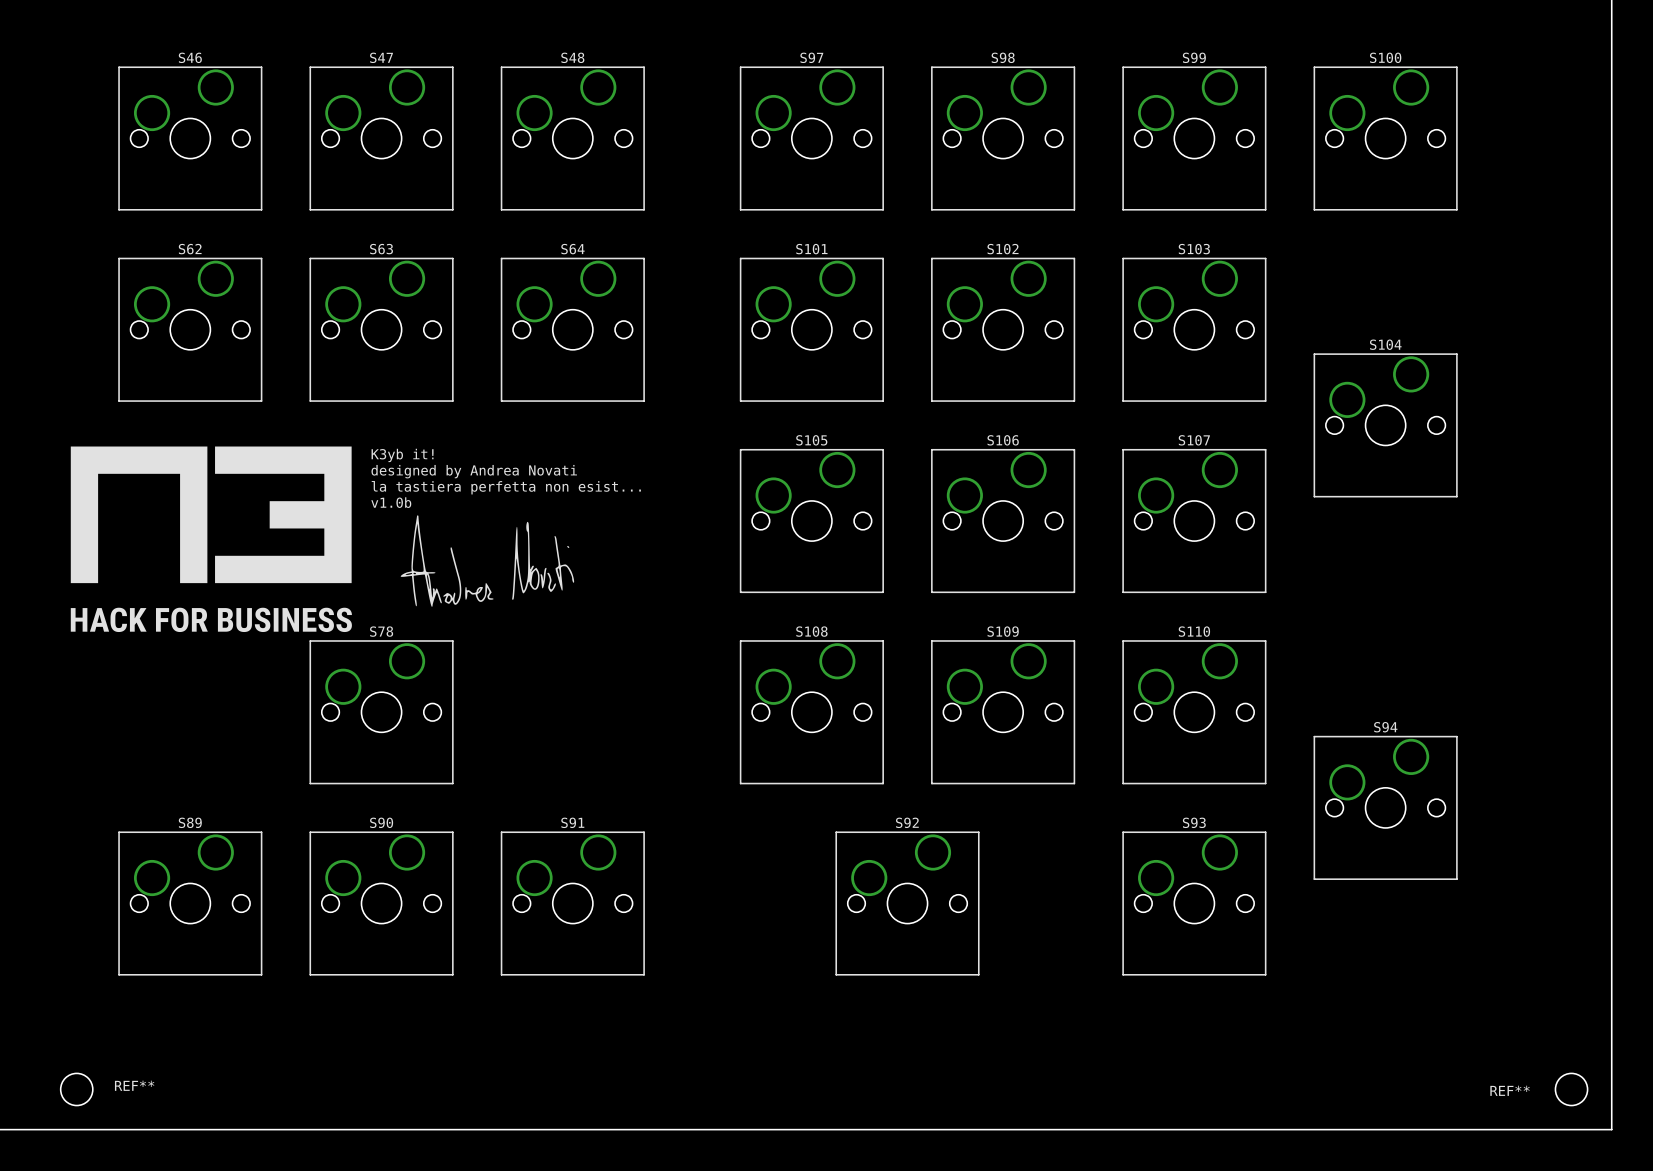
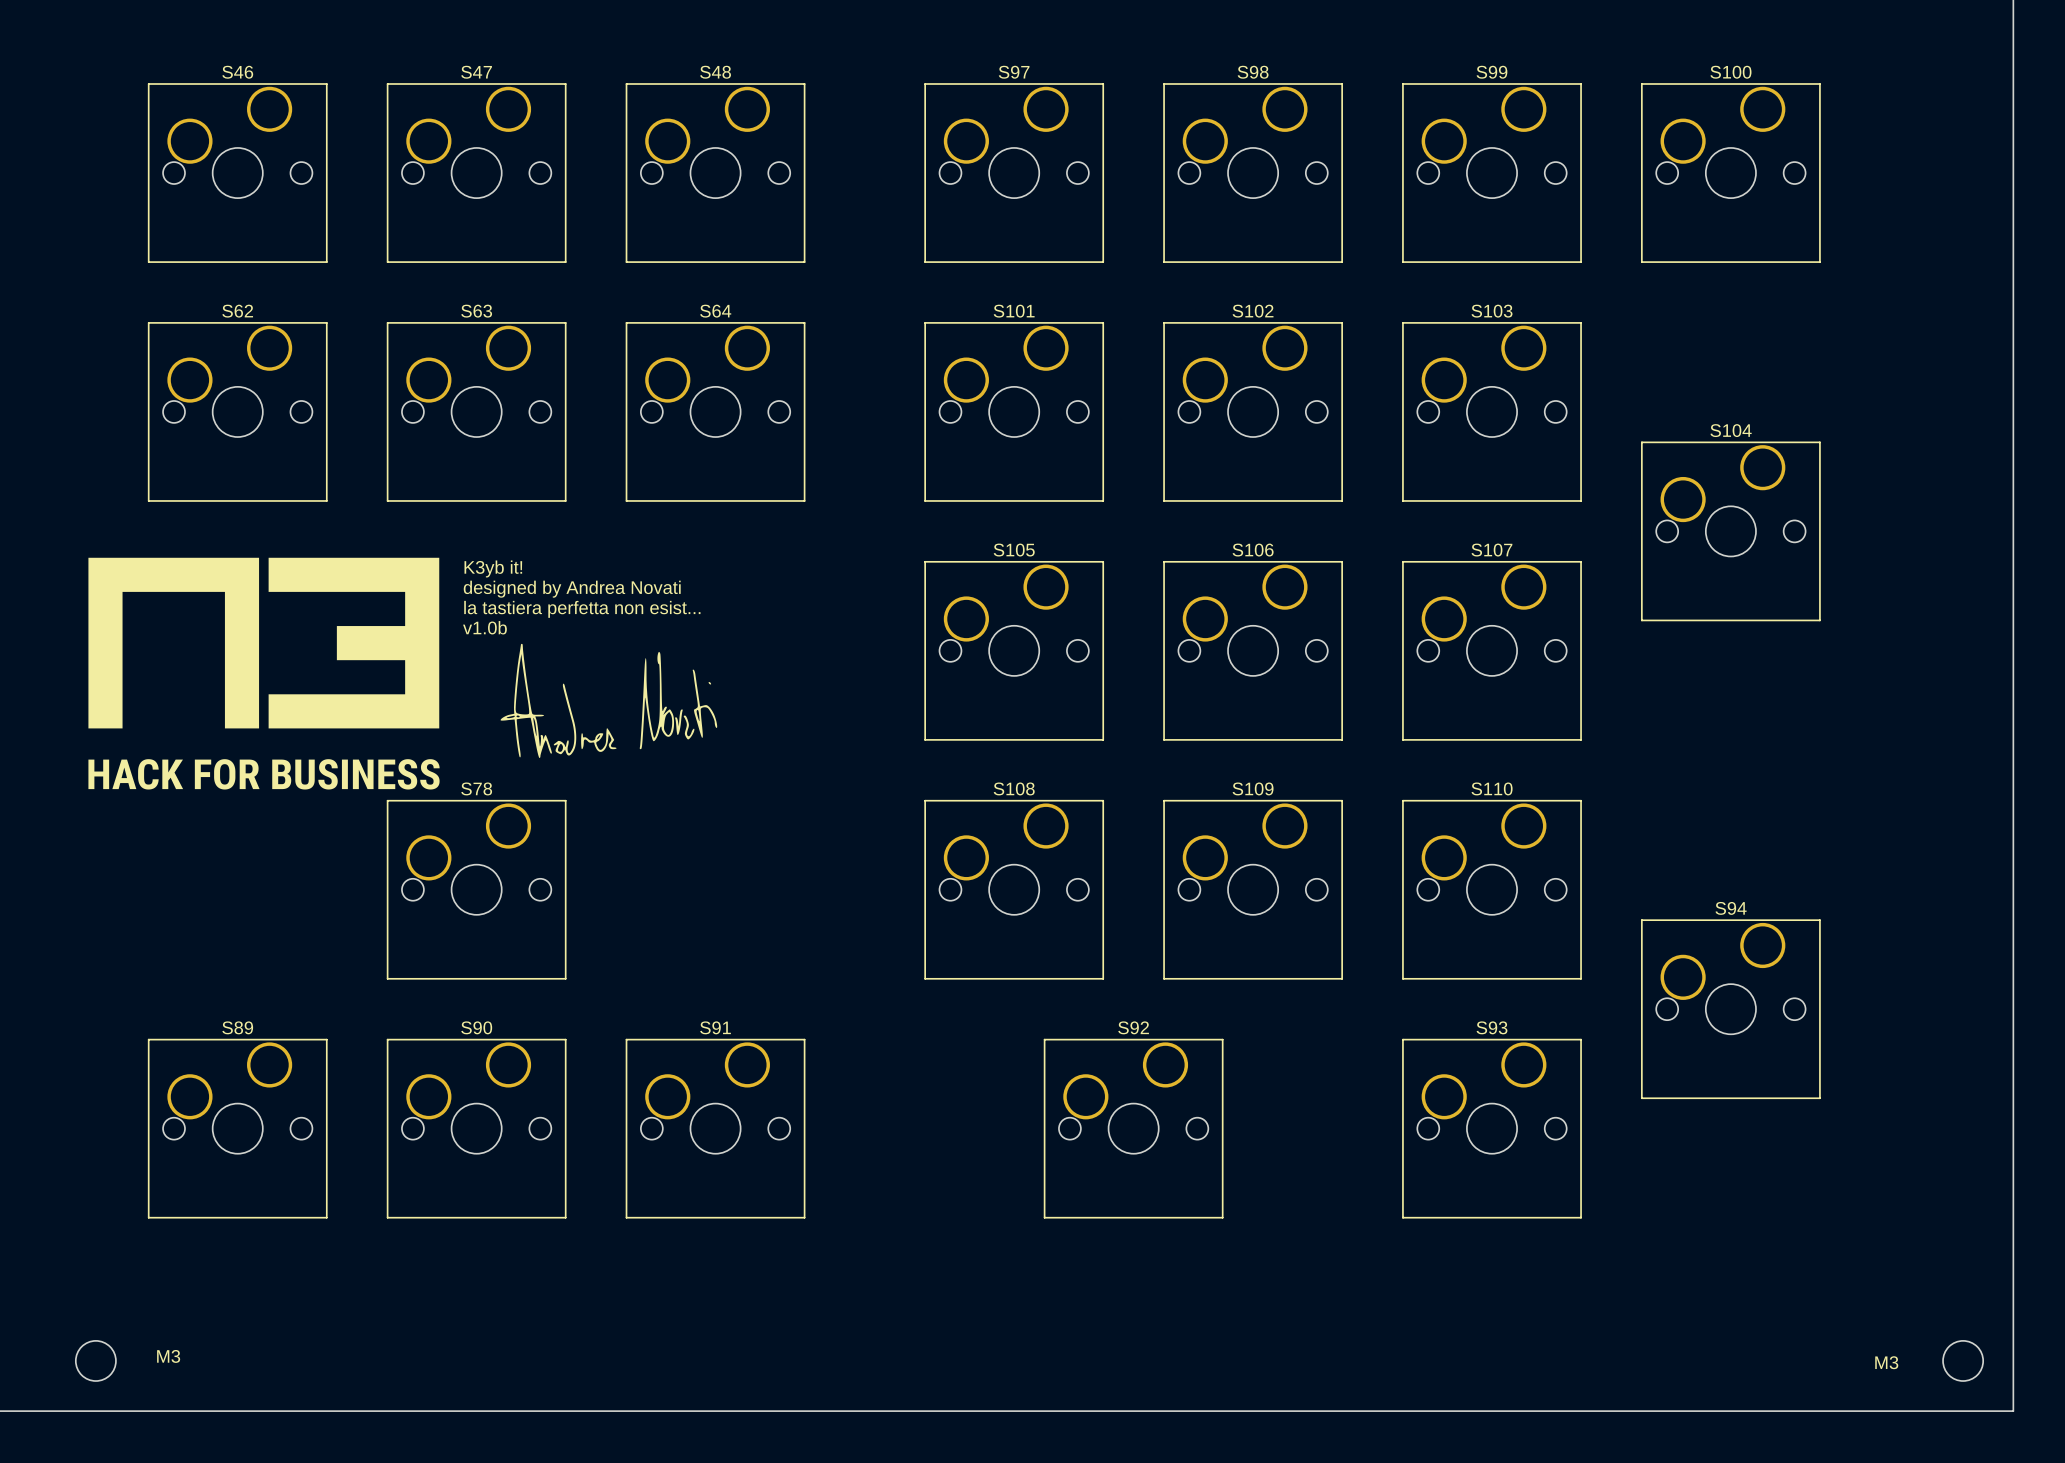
REF** name: REF** (134, 1085) -> M3 (168, 1356)
REF** name: REF** (1510, 1090) -> M3 (1886, 1362)

